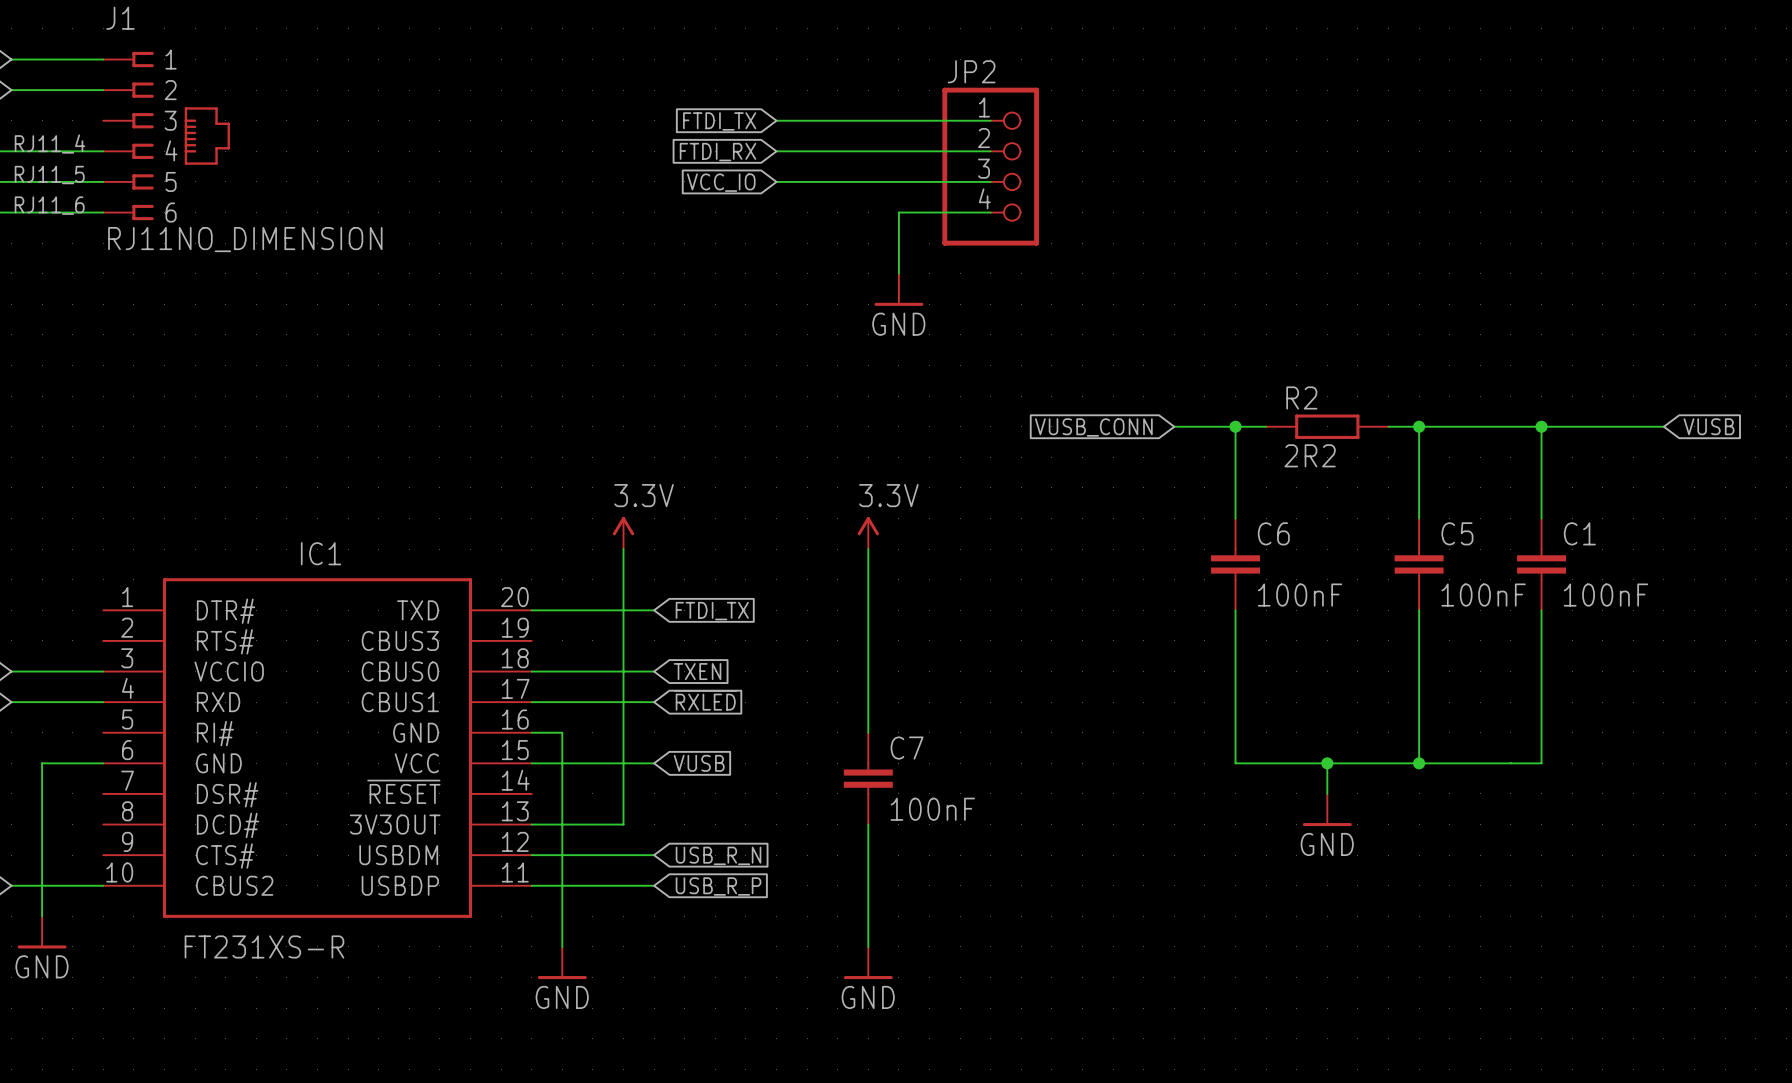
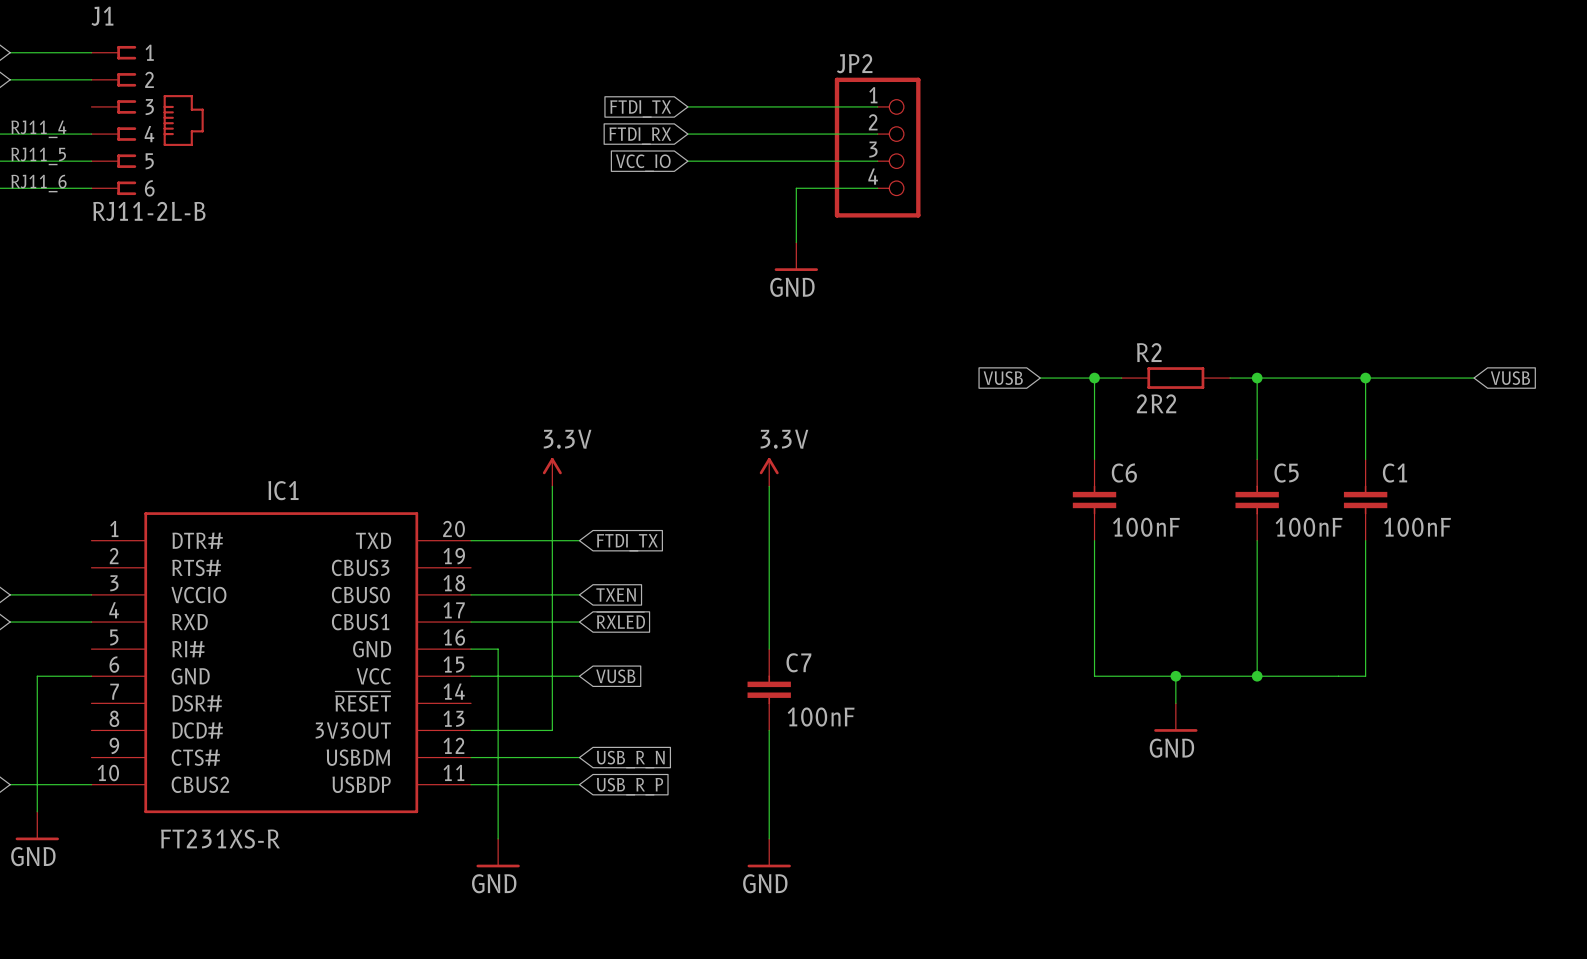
J1 value: RJ11NO_DIMENSION (245, 239) -> RJ11-2L-B (149, 211)
global label: VUSB_CONN (1093, 427) -> VUSB (1003, 378)

